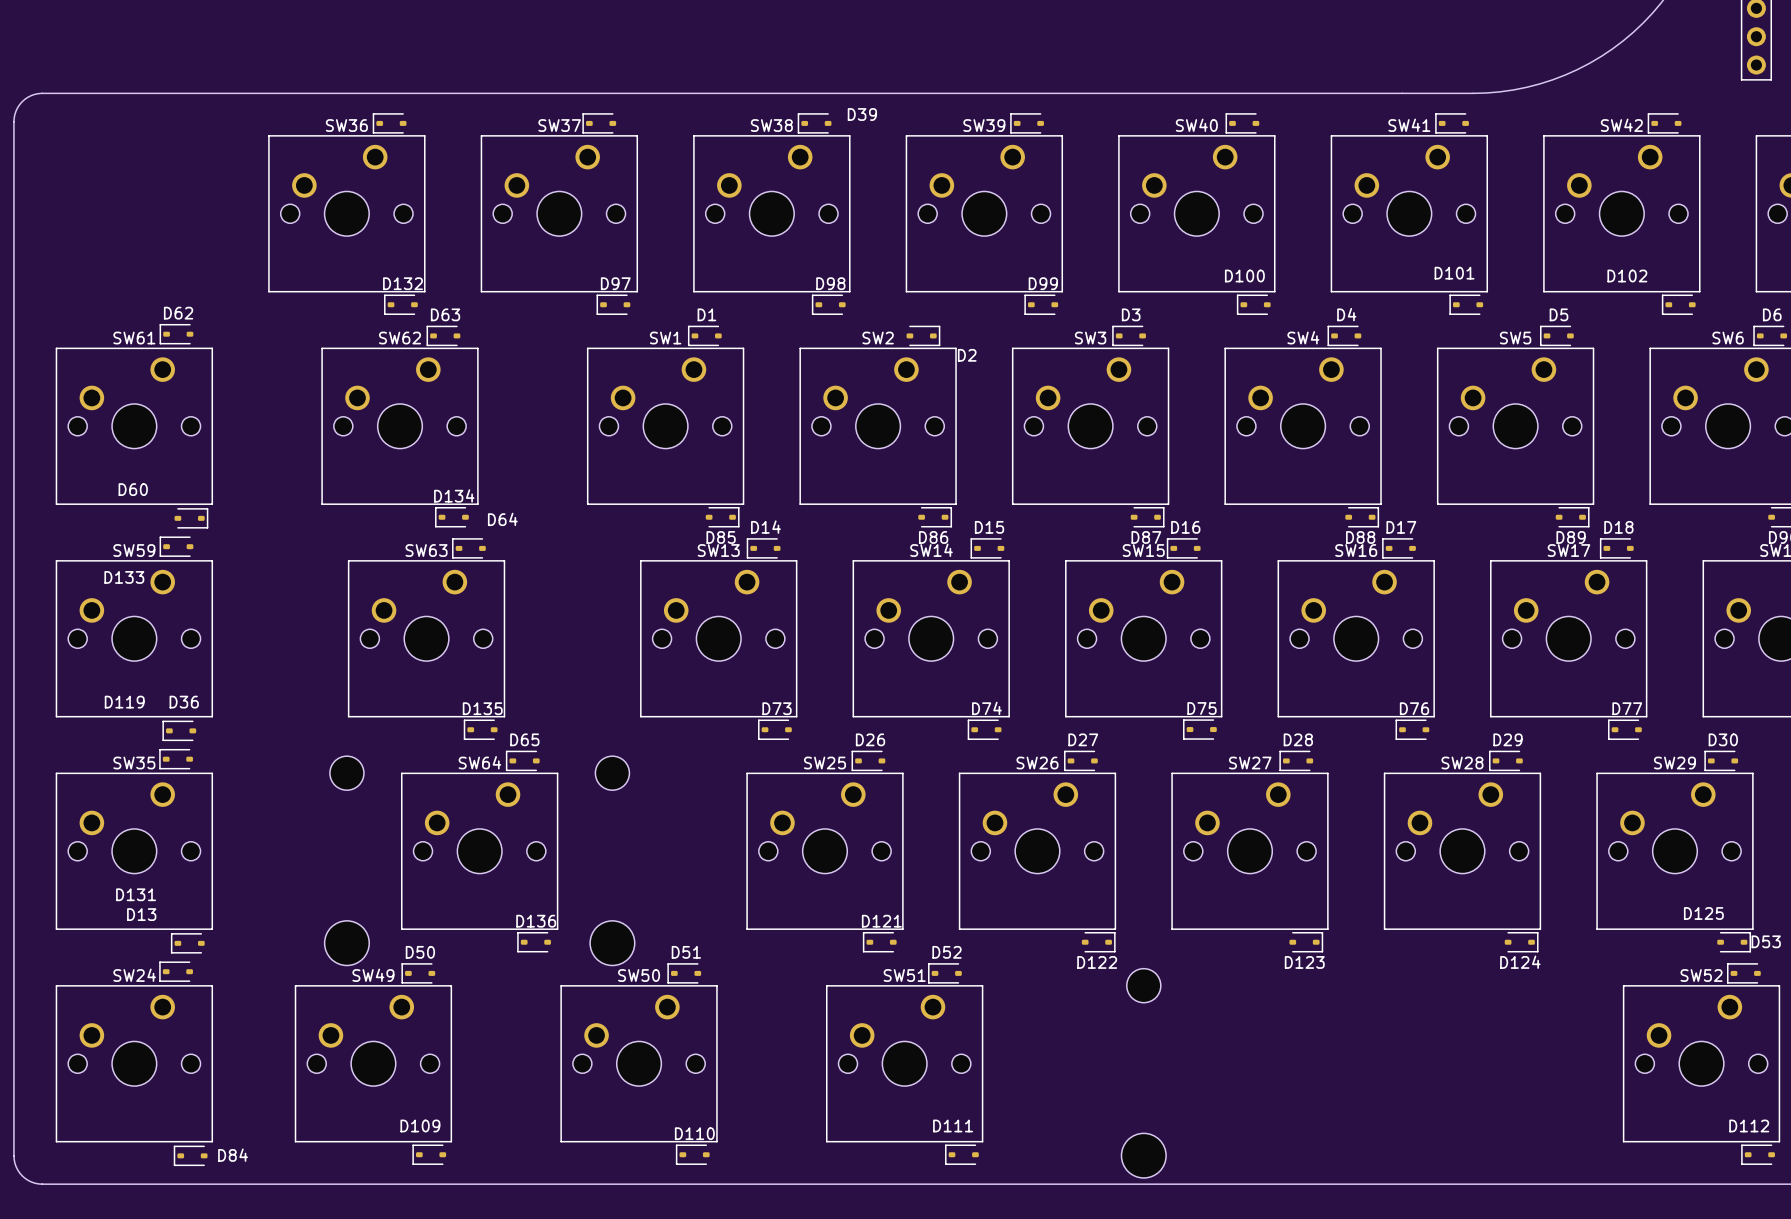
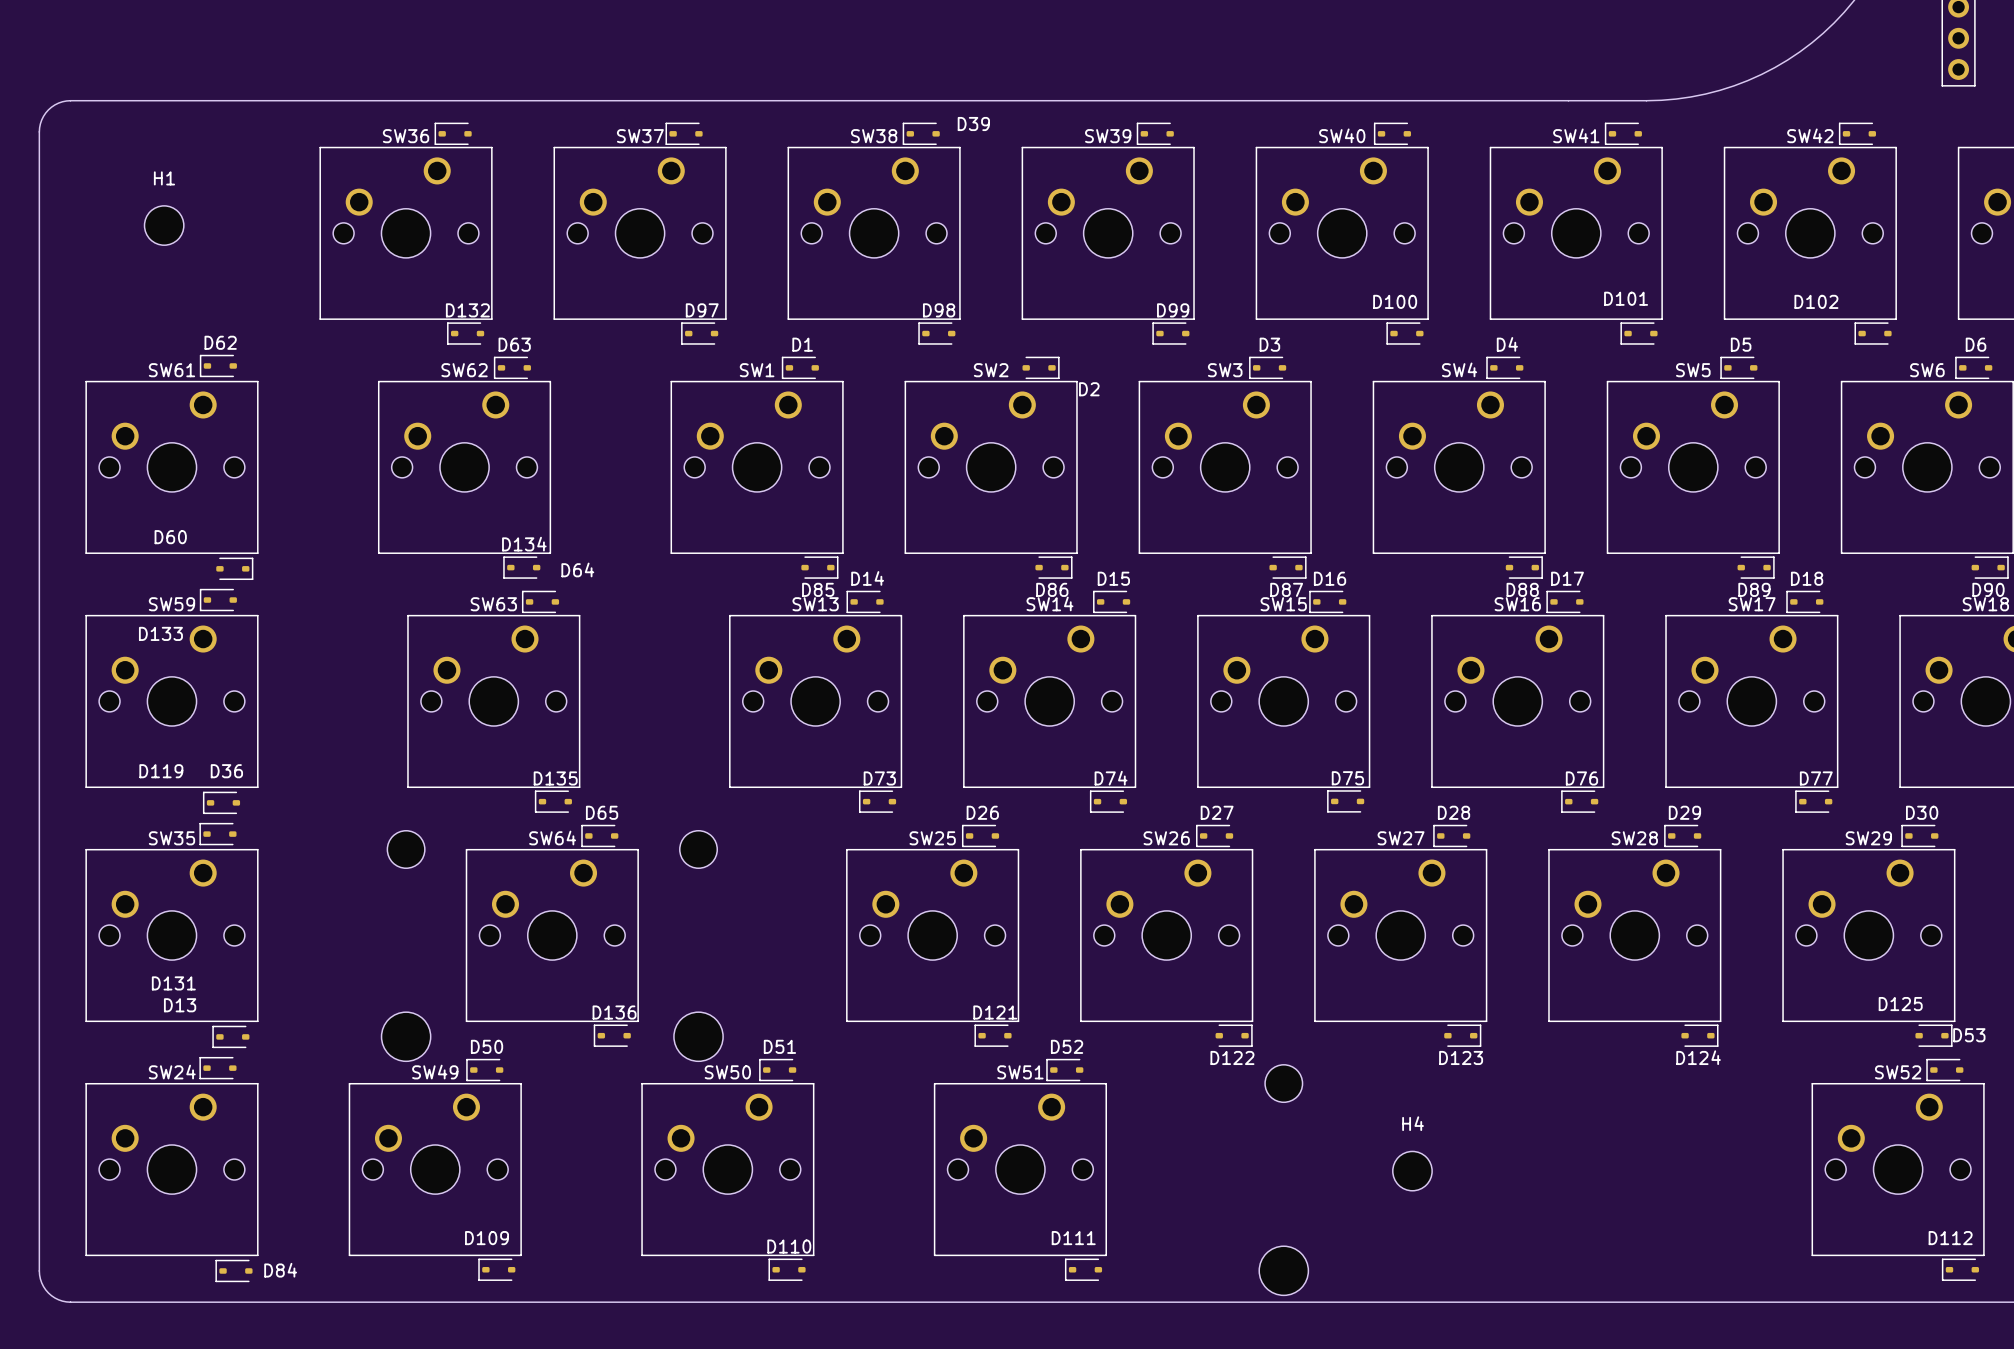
H1: none -> (164, 225)
H4: none -> (1412, 1171)

